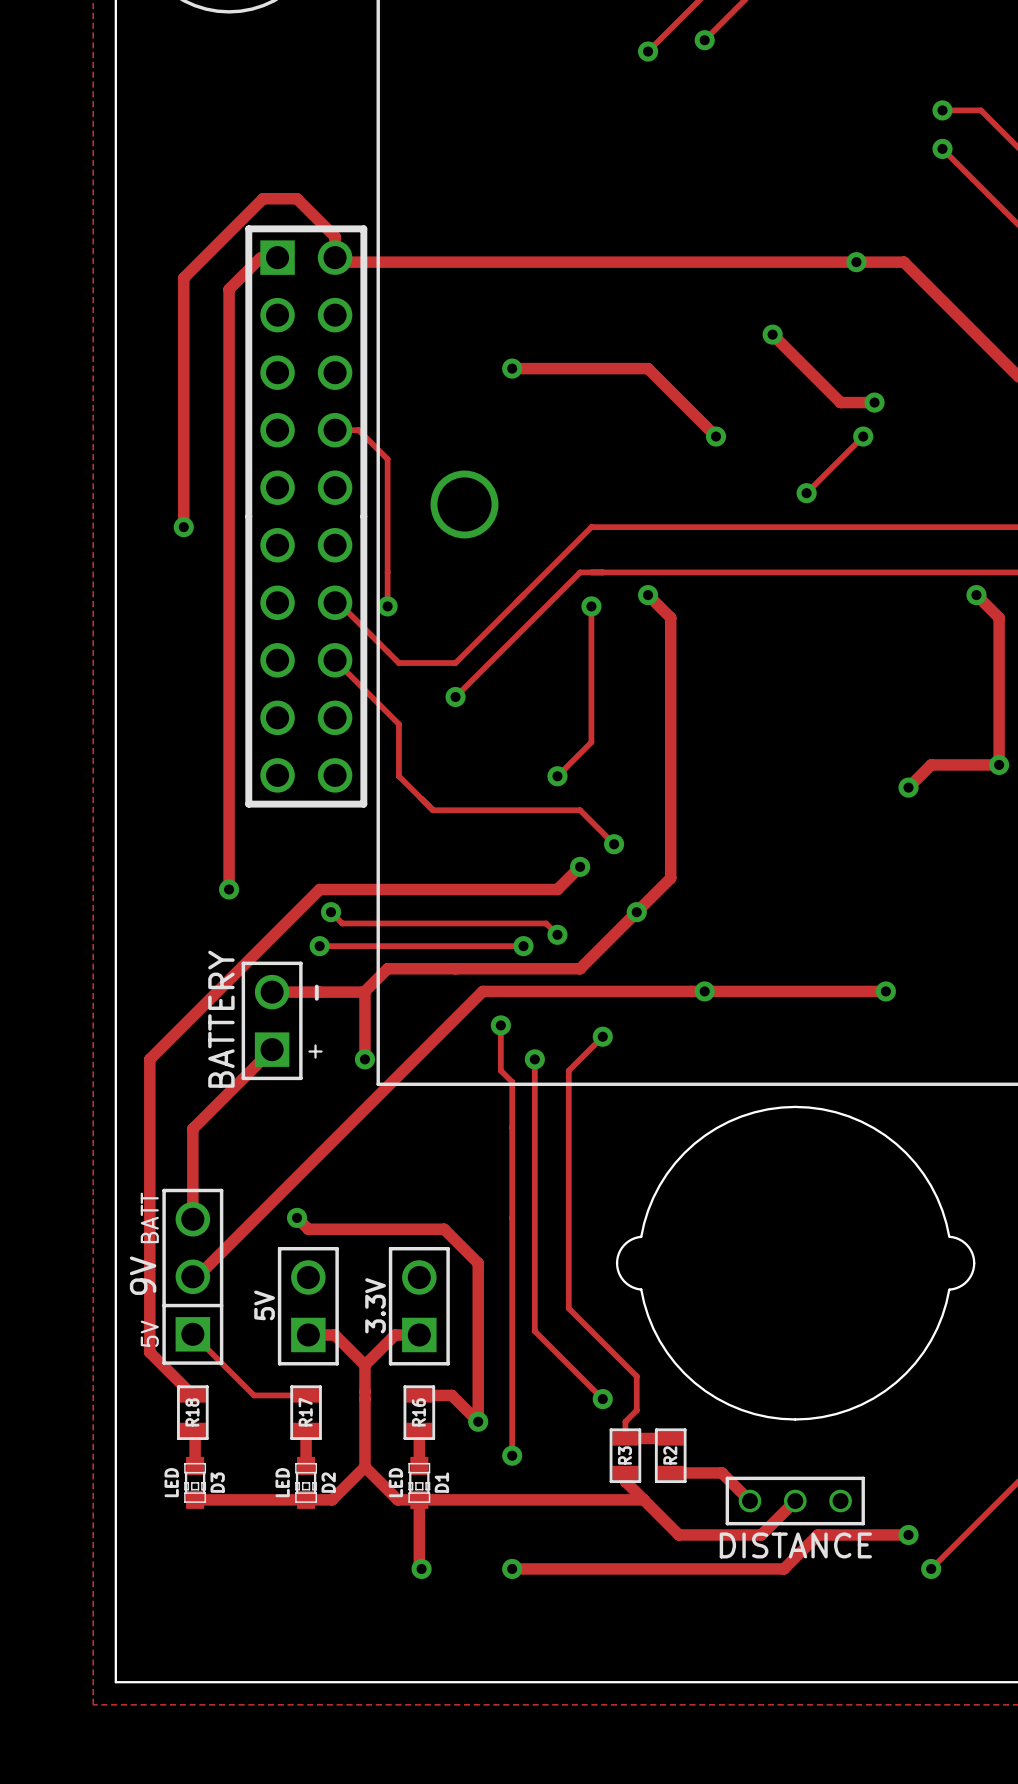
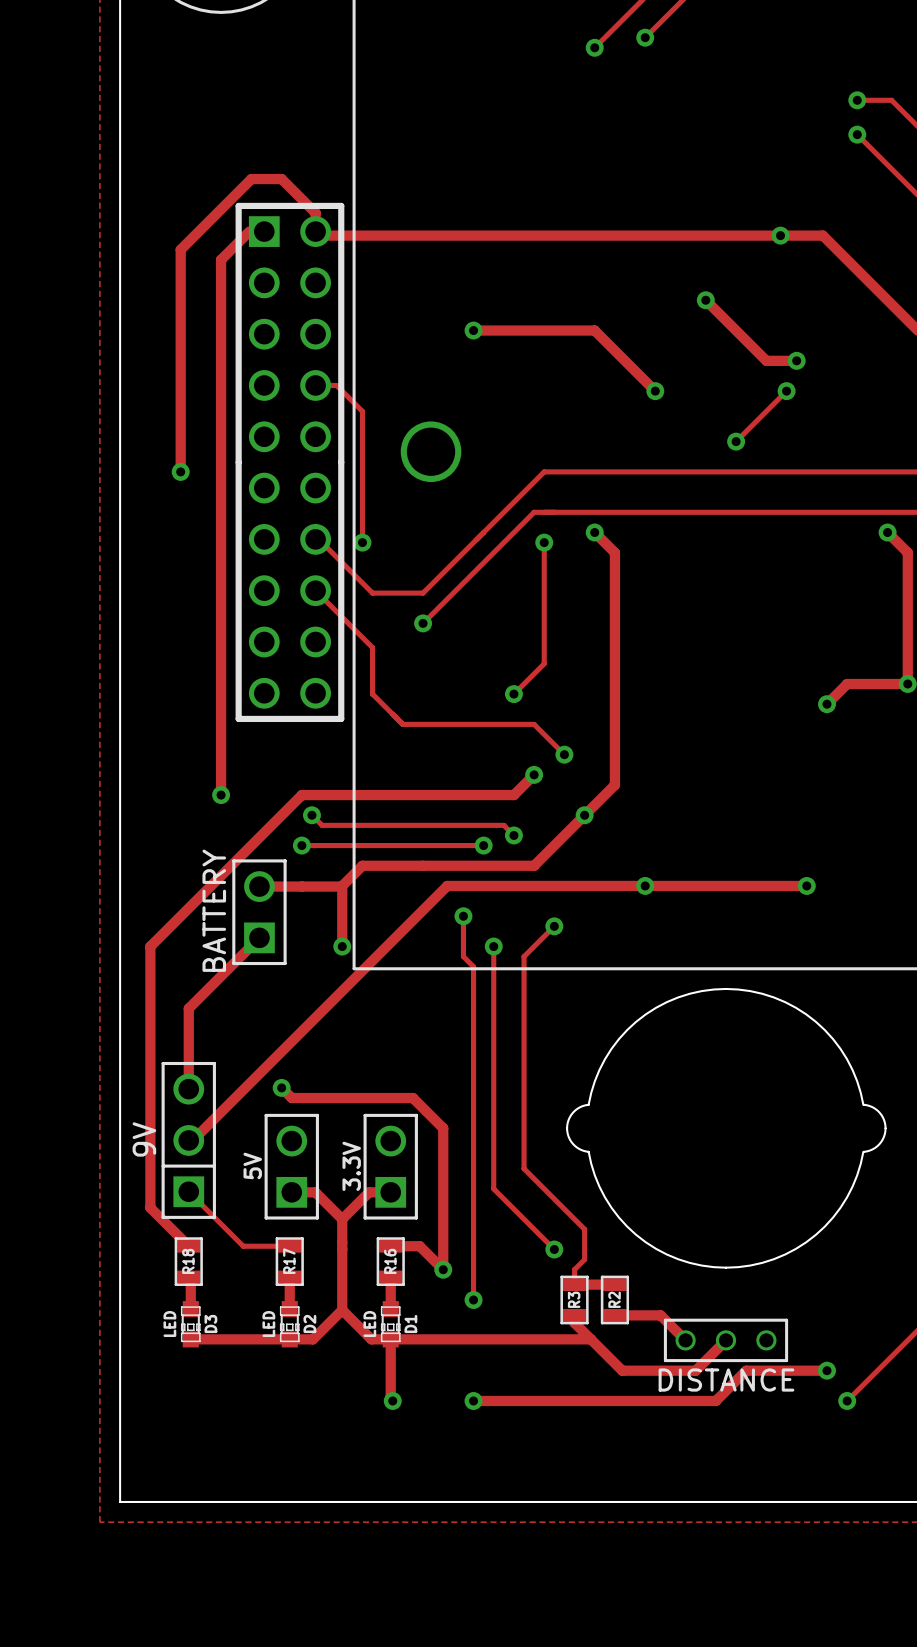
text: - (316, 992) -> none
text: + (315, 1051) -> none
text: BATT (149, 1217) -> none
text: 5V (149, 1333) -> none

